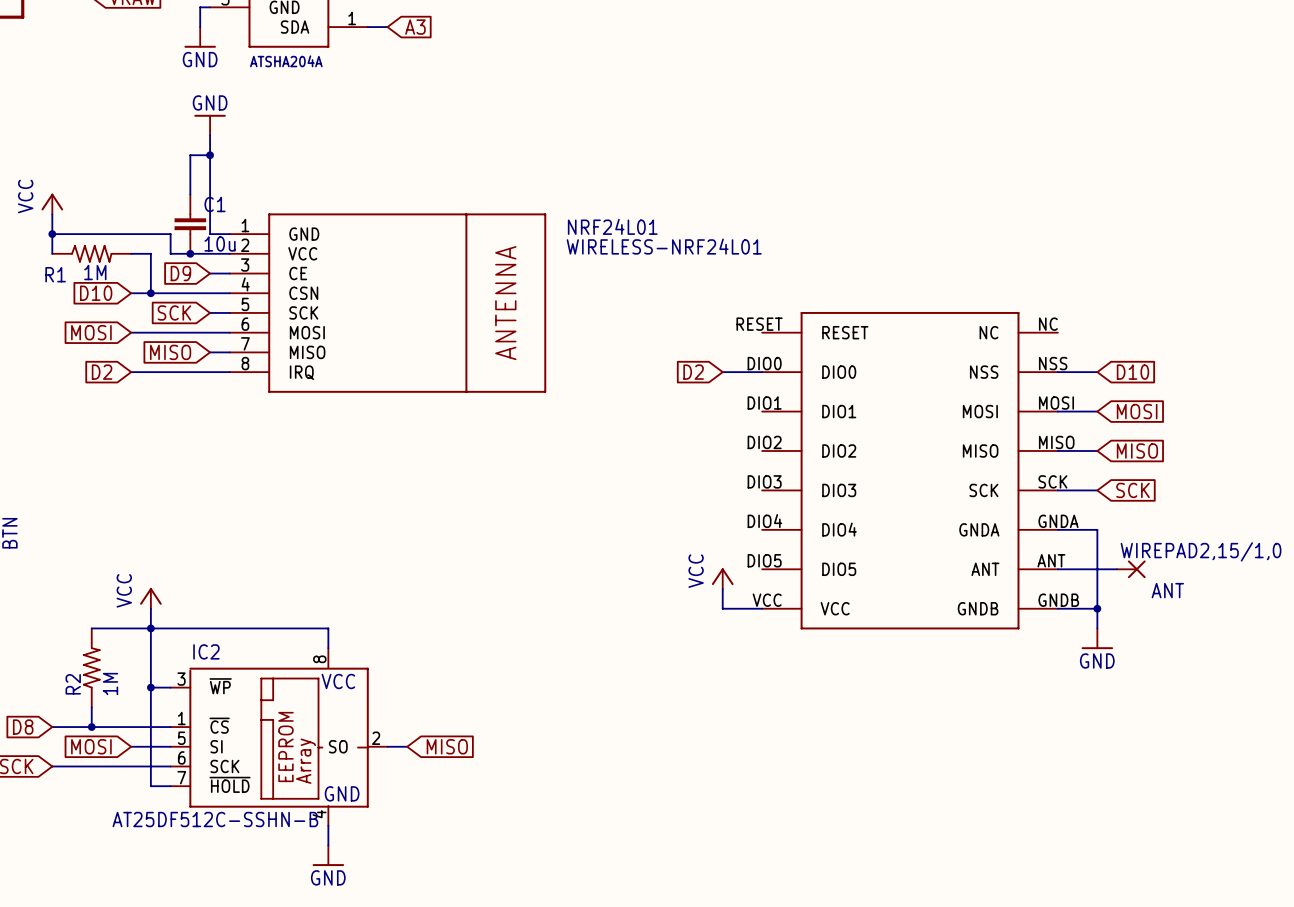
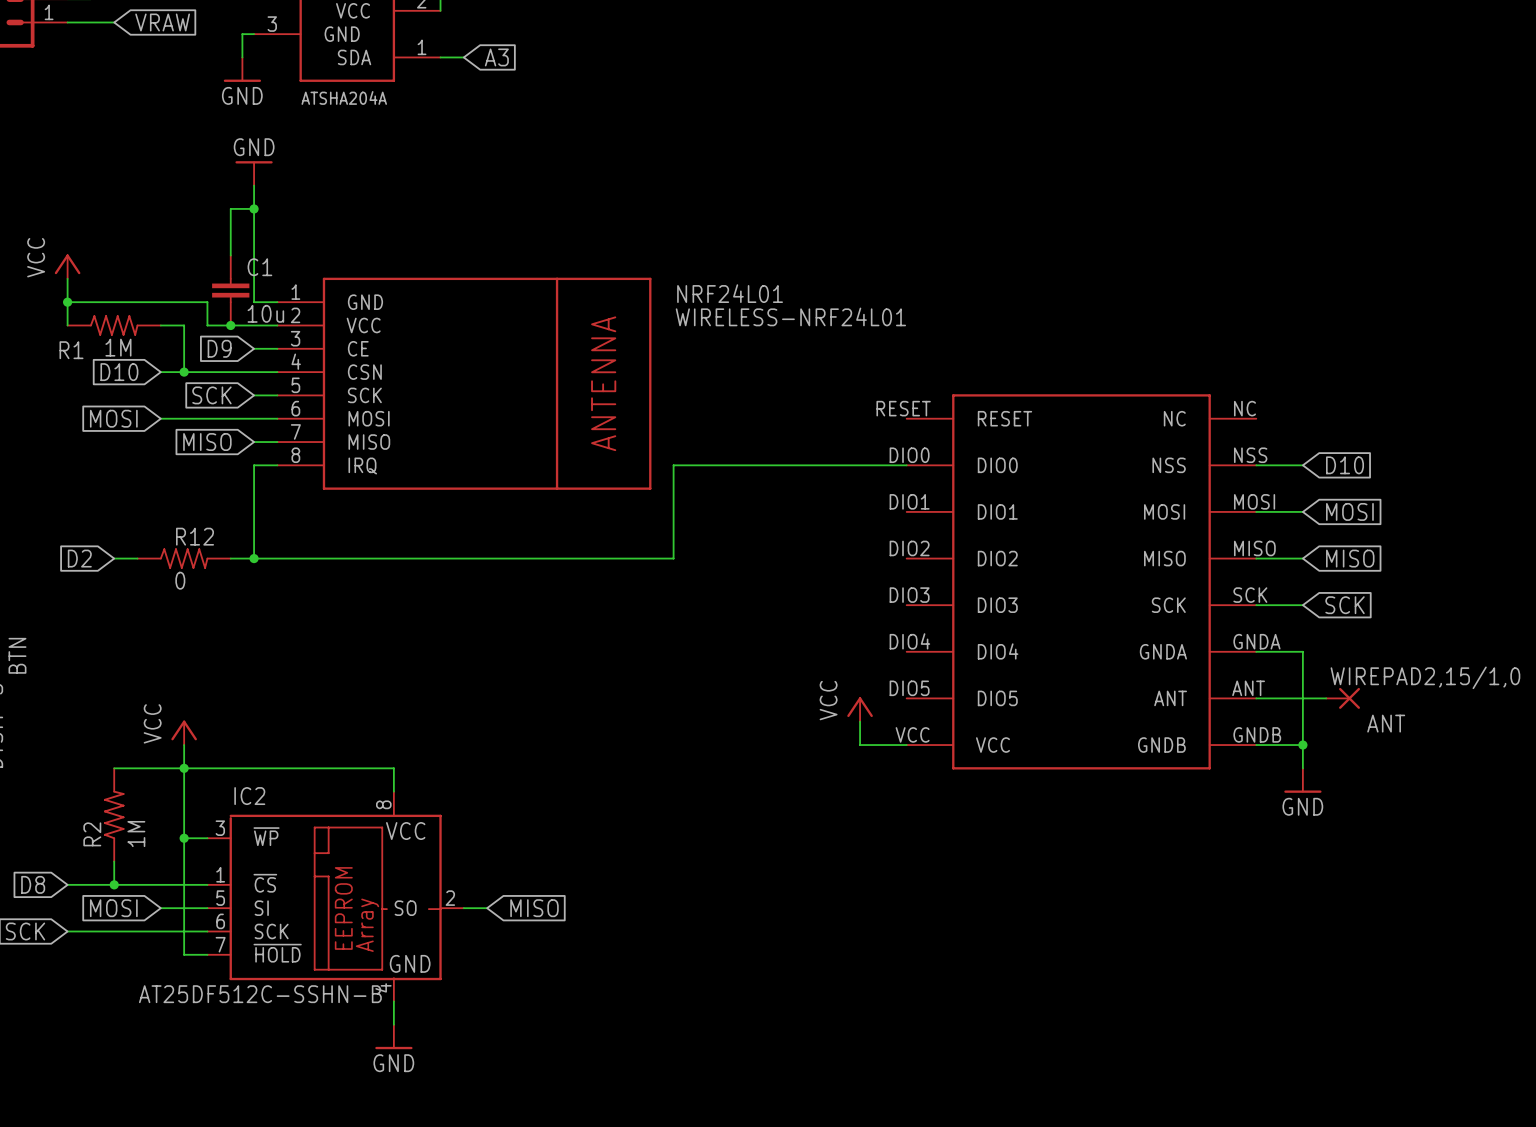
global label position: D2 (102, 372) -> D2 (79, 558)
wire: (131, 372) (210, 372) -> (254, 558) (254, 465)
global label: D2 (693, 372) -> none
wire: none -> (860, 465) (673, 465) (673, 558) (230, 558)
wire: none -> (114, 558) (137, 558)
R12: none -> 0 (184, 558)
junction: none -> (254, 558)

